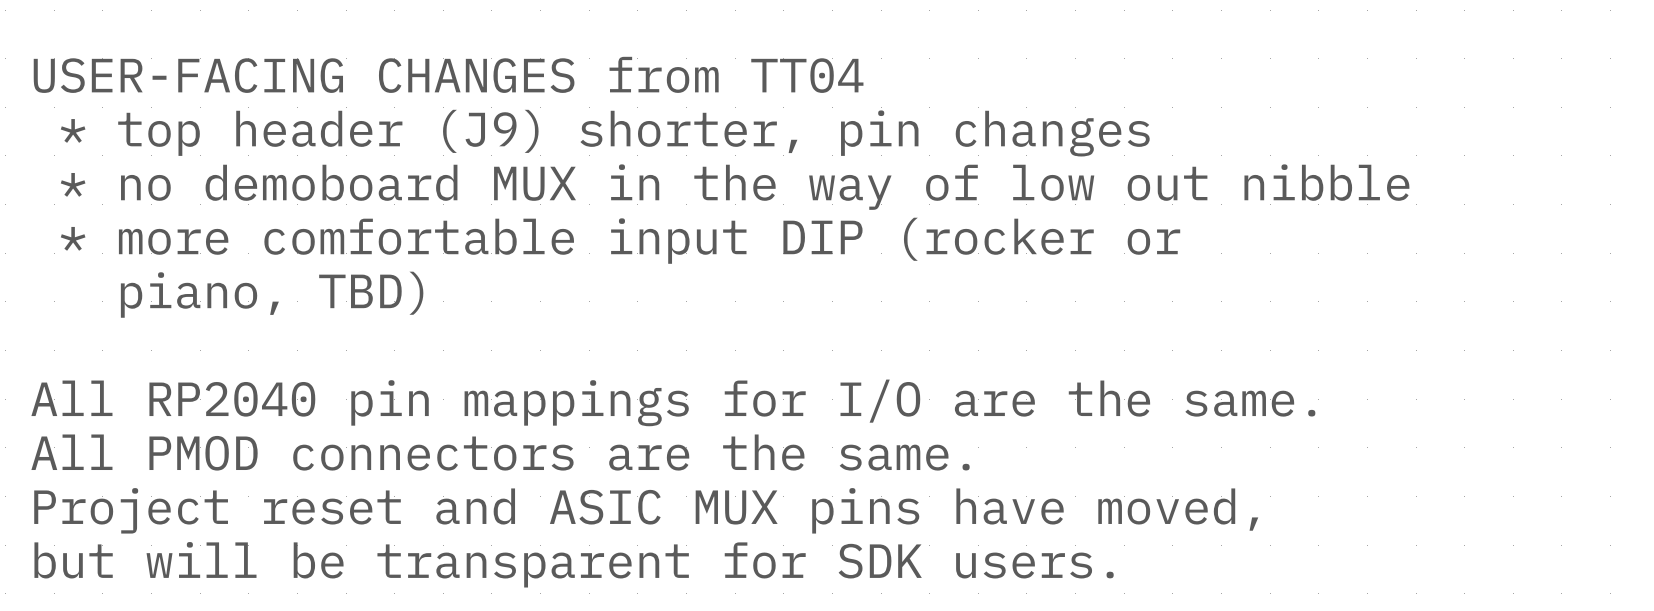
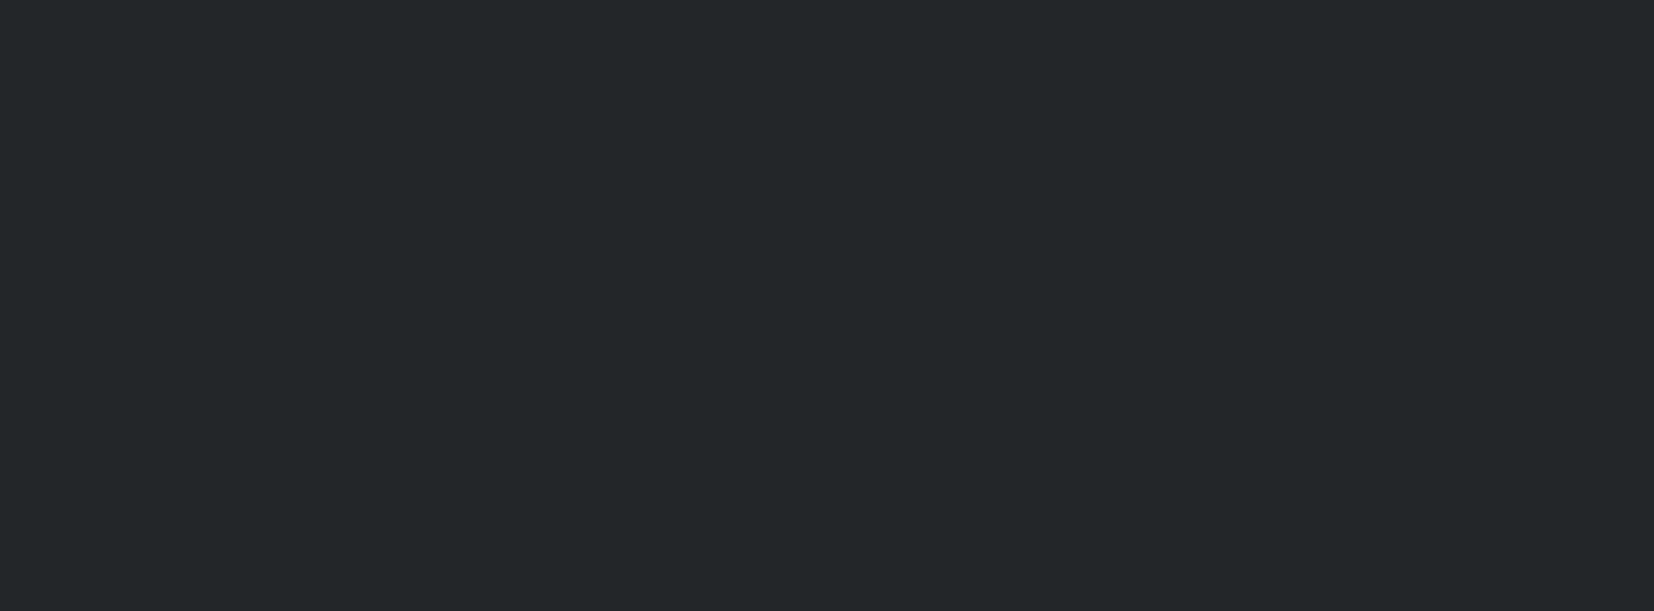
text: USER-FACING CHANGES from TT04 (448, 74) -> none
text: * top header (J9) shorter, pin changes (605, 133) -> none
text: * no demoboard MUX in the way of low out nibble (735, 187) -> none
text: * more comfortable input DIP (rocker or (620, 240) -> none
text: piano, TBD) (272, 294) -> none
text: All RP2040 pin mappings for I/O are the same. (673, 402) -> none
text: All PMOD connectors are the same. (500, 452) -> none
text: Project reset and ASIC MUX pins have moved, (646, 510) -> none
text: but will be transparent for SDK users. (574, 564) -> none

